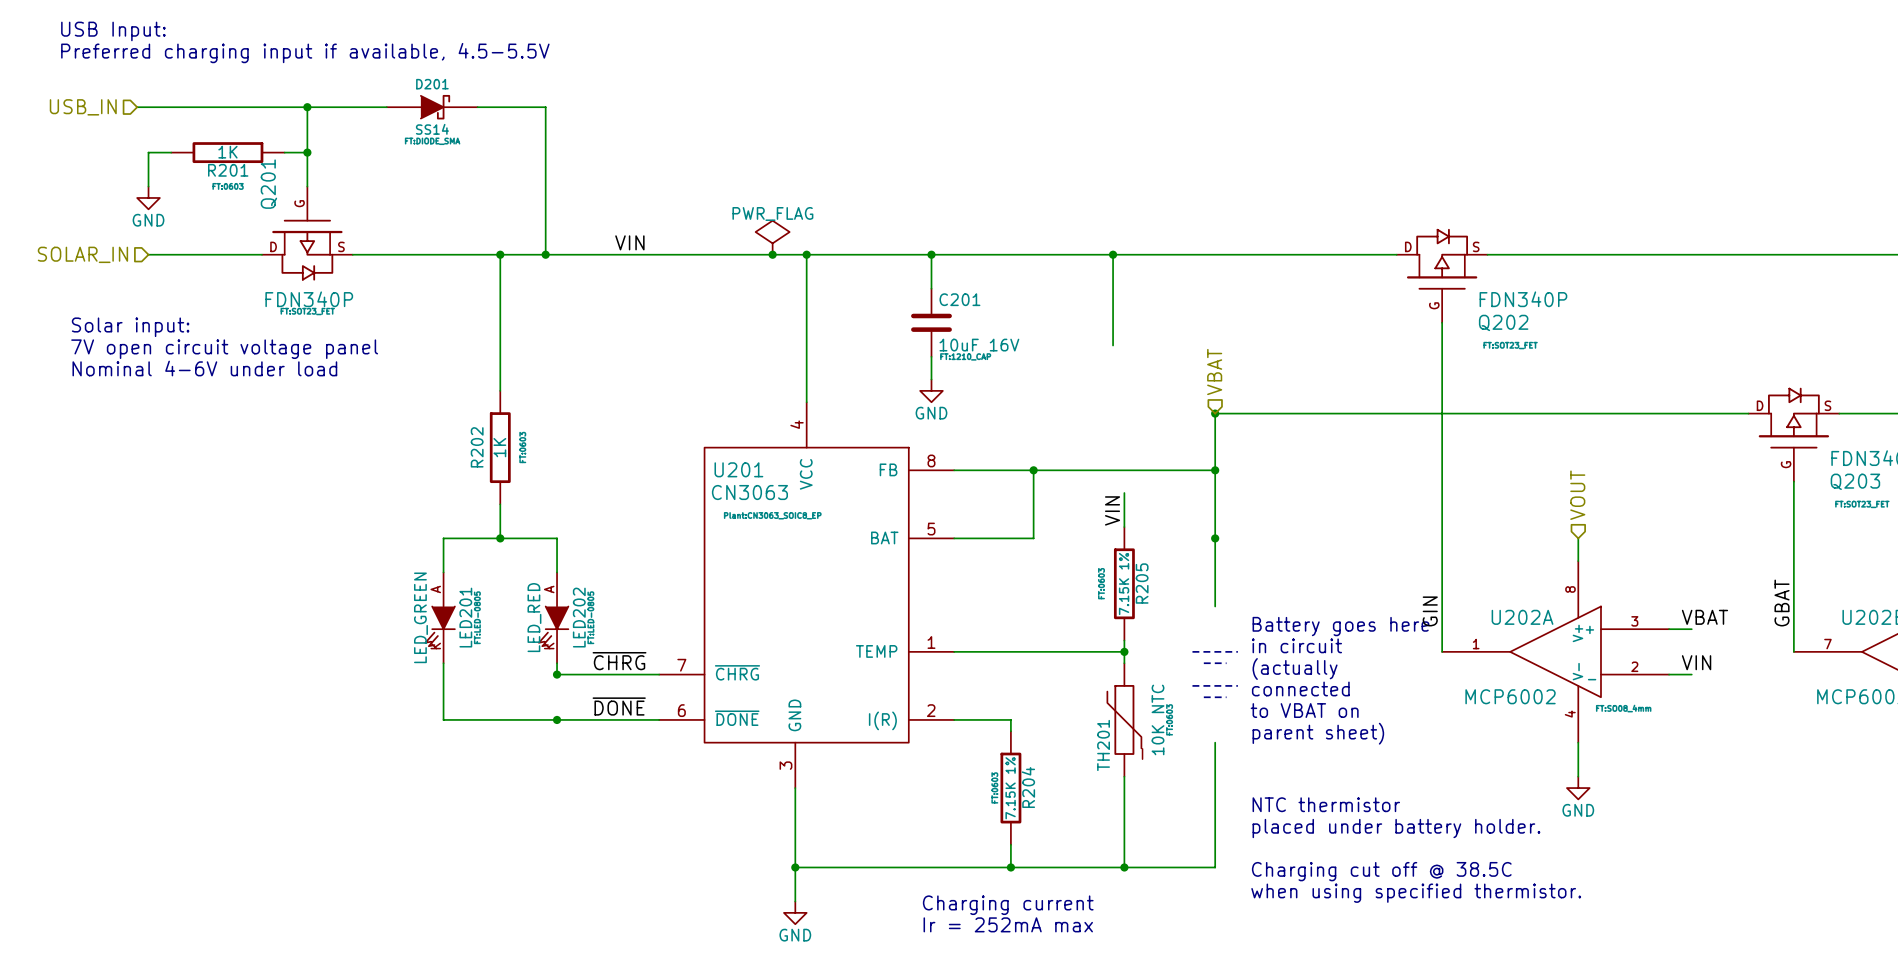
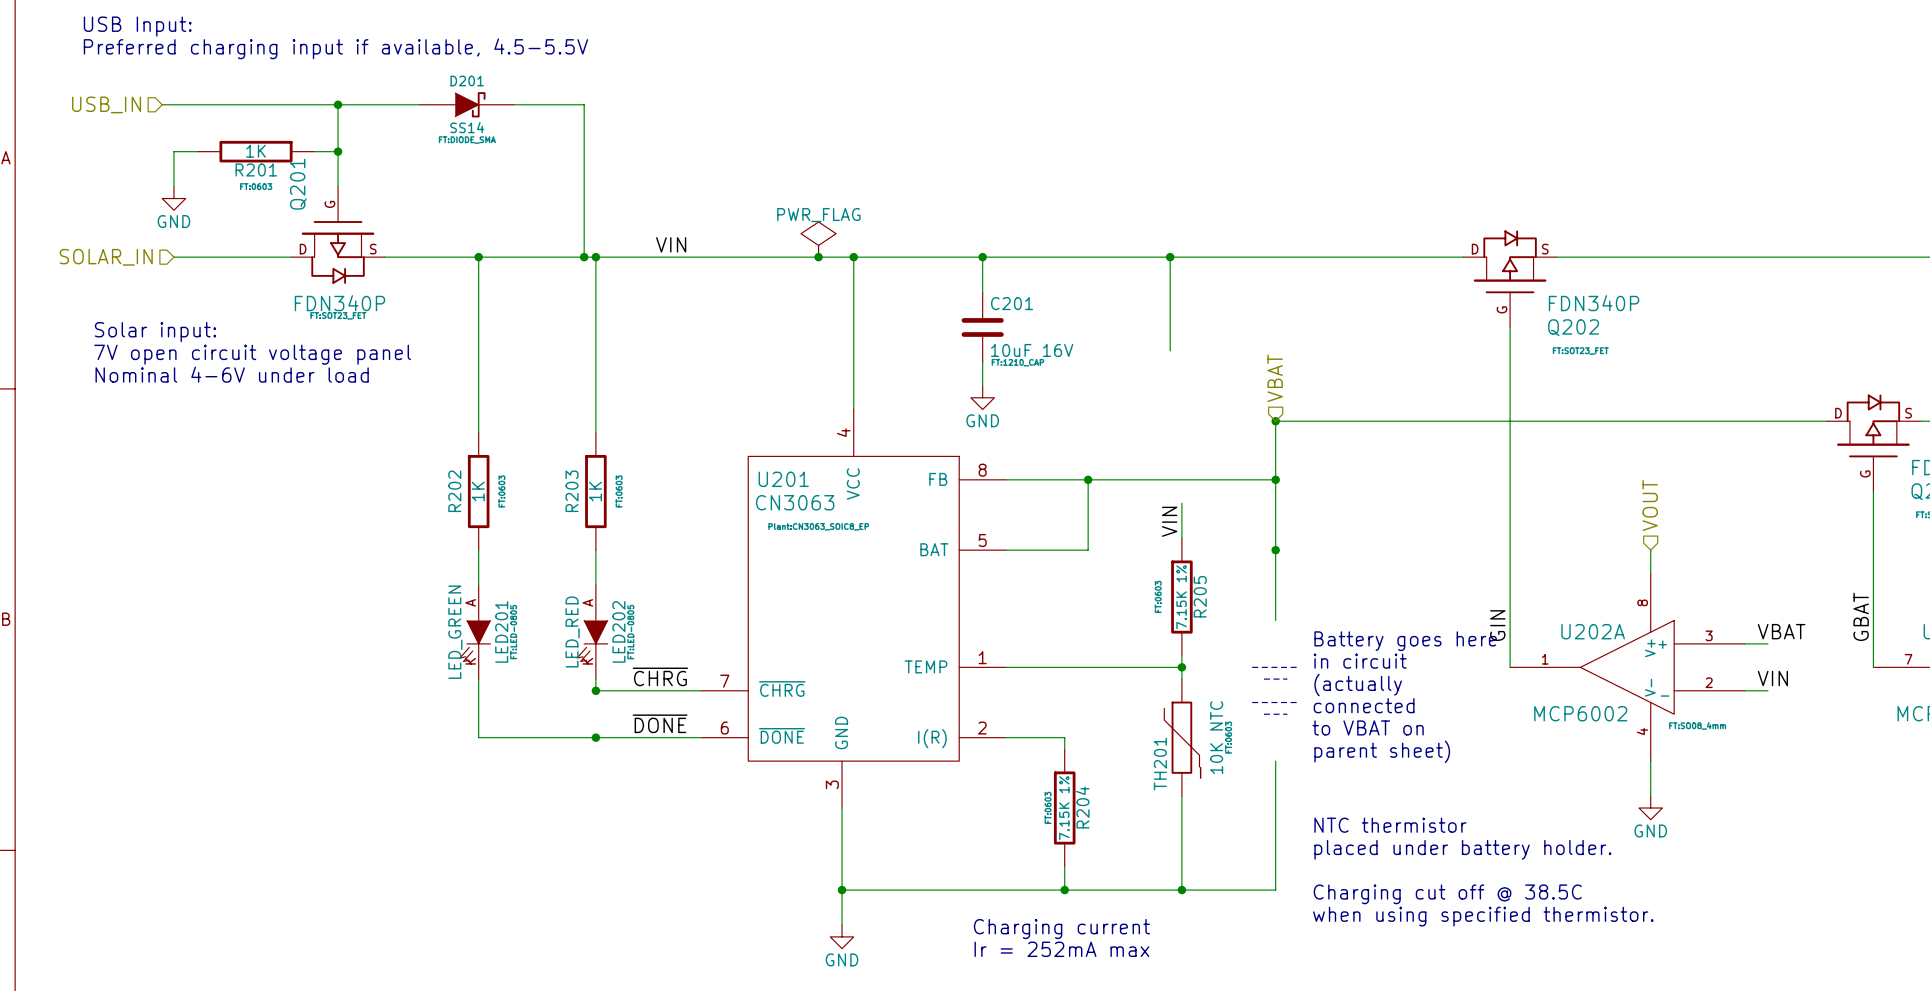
wire: none -> (478, 257) (478, 432)
junction: none -> (478, 257)
wire: (500, 254) (500, 390) -> none
junction: (500, 254) -> none
wire: none -> (595, 257) (595, 432)
junction: none -> (595, 257)
R202 position: (500, 447) -> (478, 491)
R203: none -> 1K (595, 491)
wire: (500, 504) (500, 538) -> none
wire: (443, 538) (557, 538) -> none
junction: (500, 538) -> none

